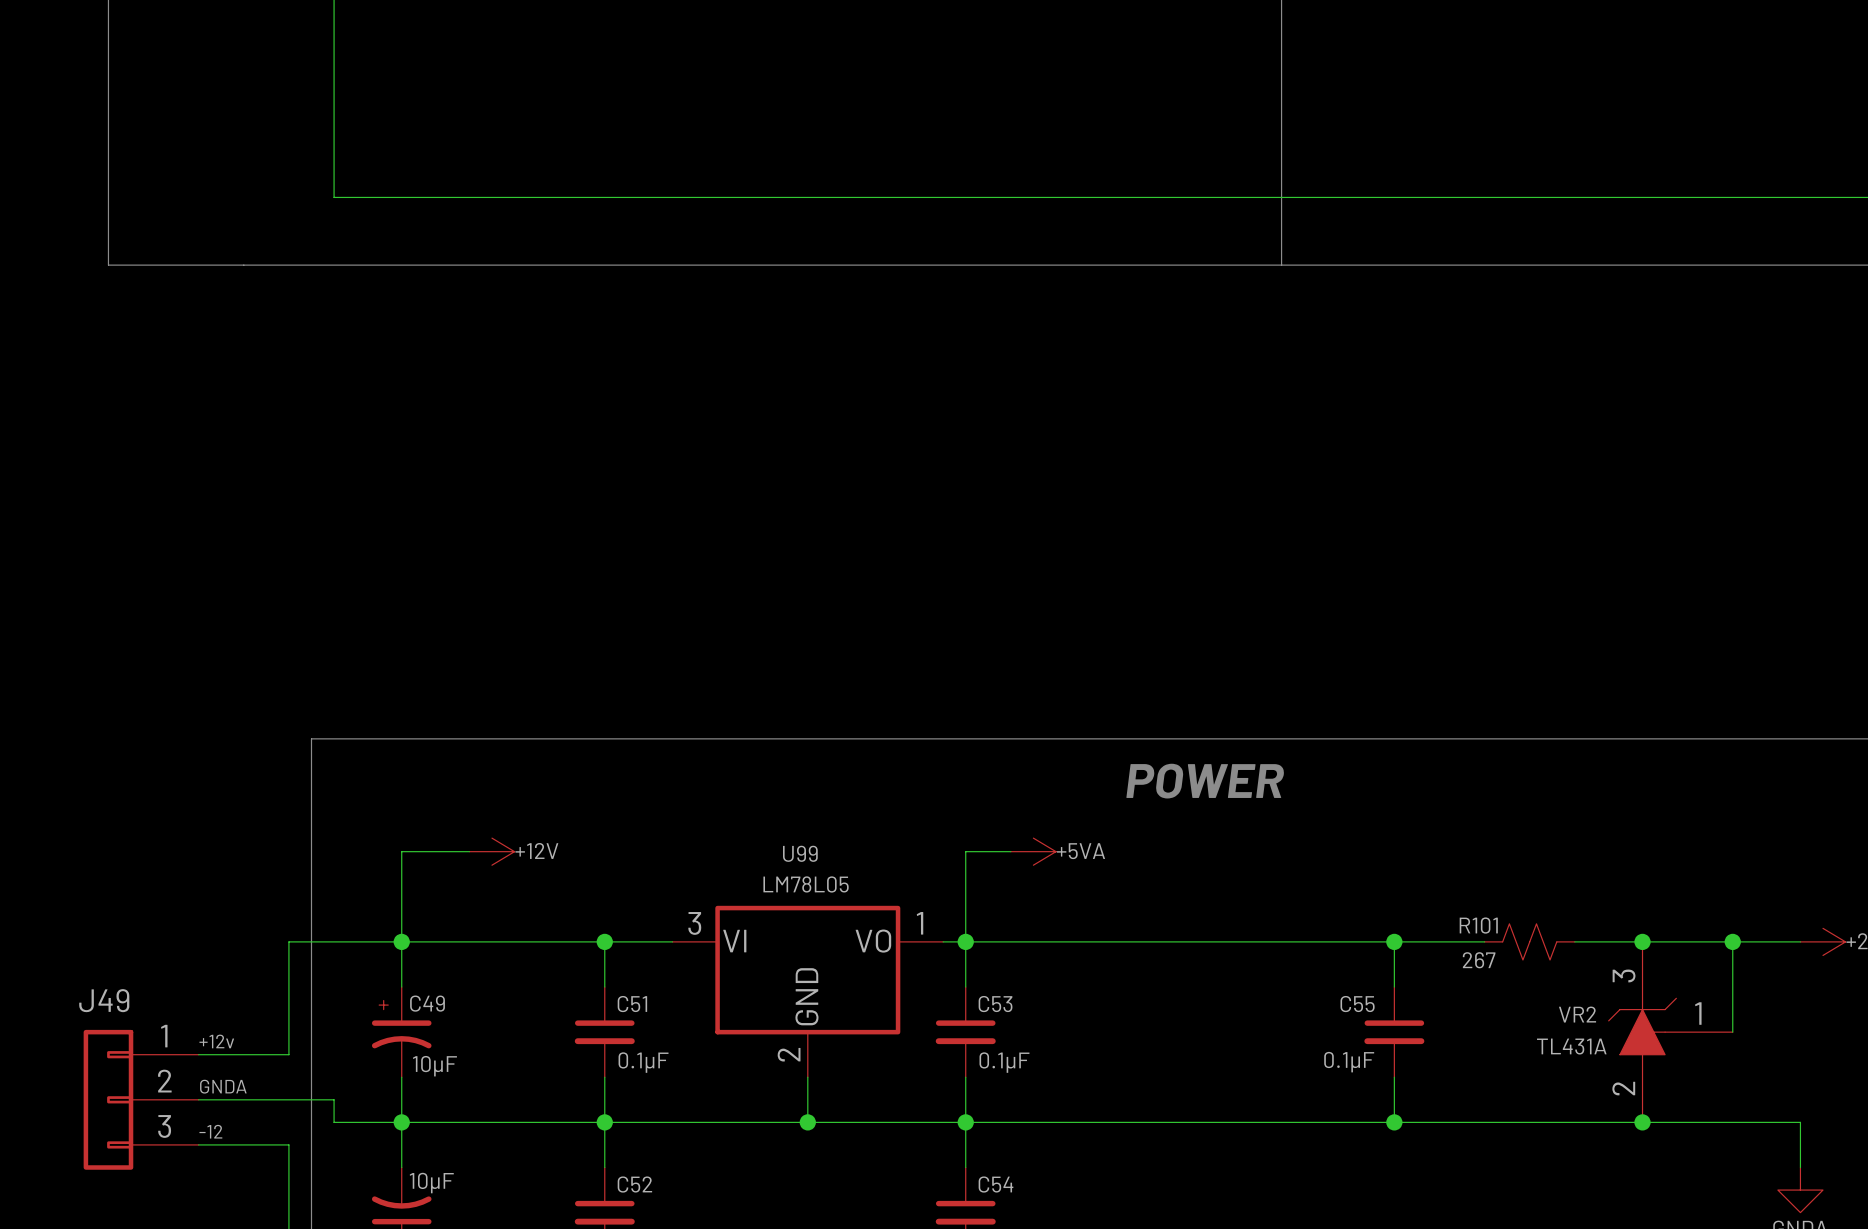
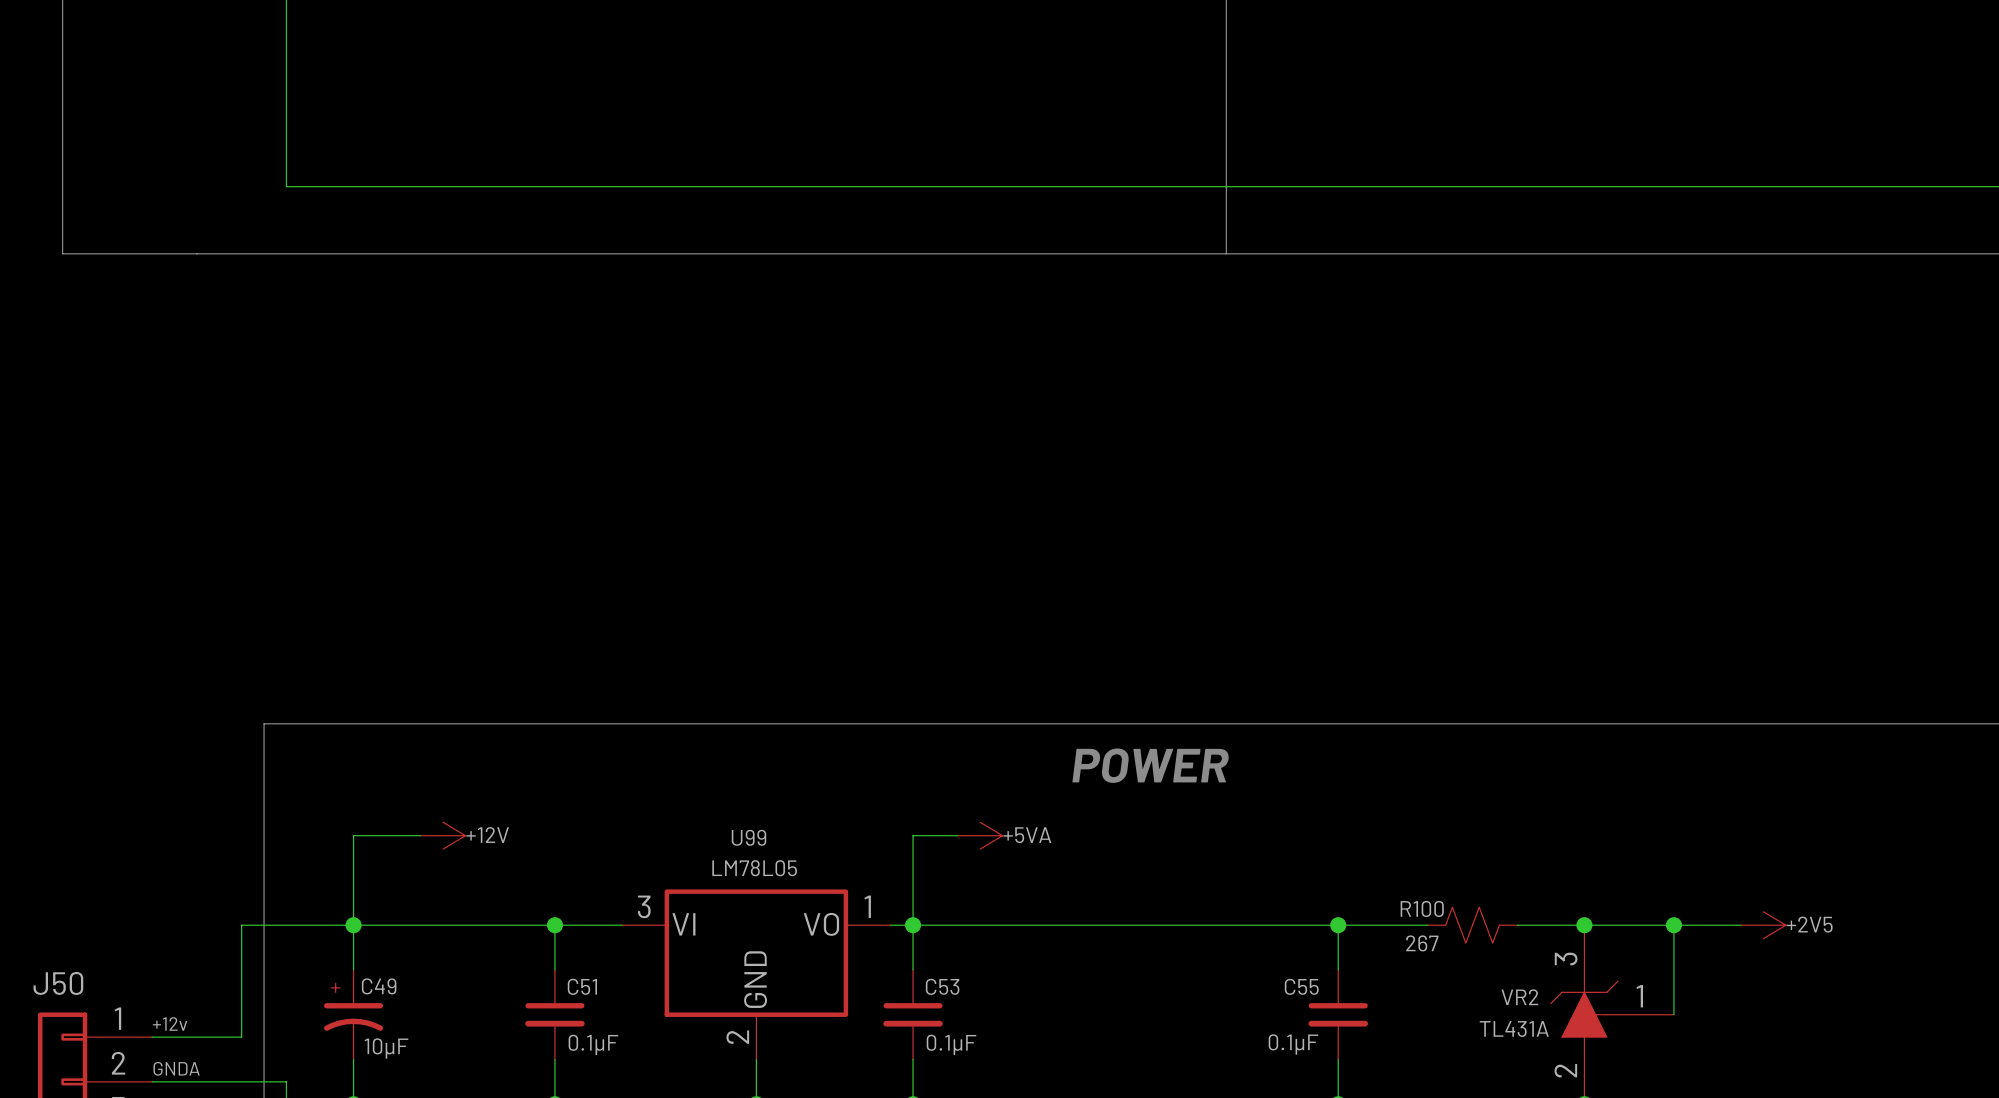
R101 name: R101 (1478, 925) -> R100 (1422, 908)
J49 name: J49 (104, 1000) -> J50 (58, 983)

